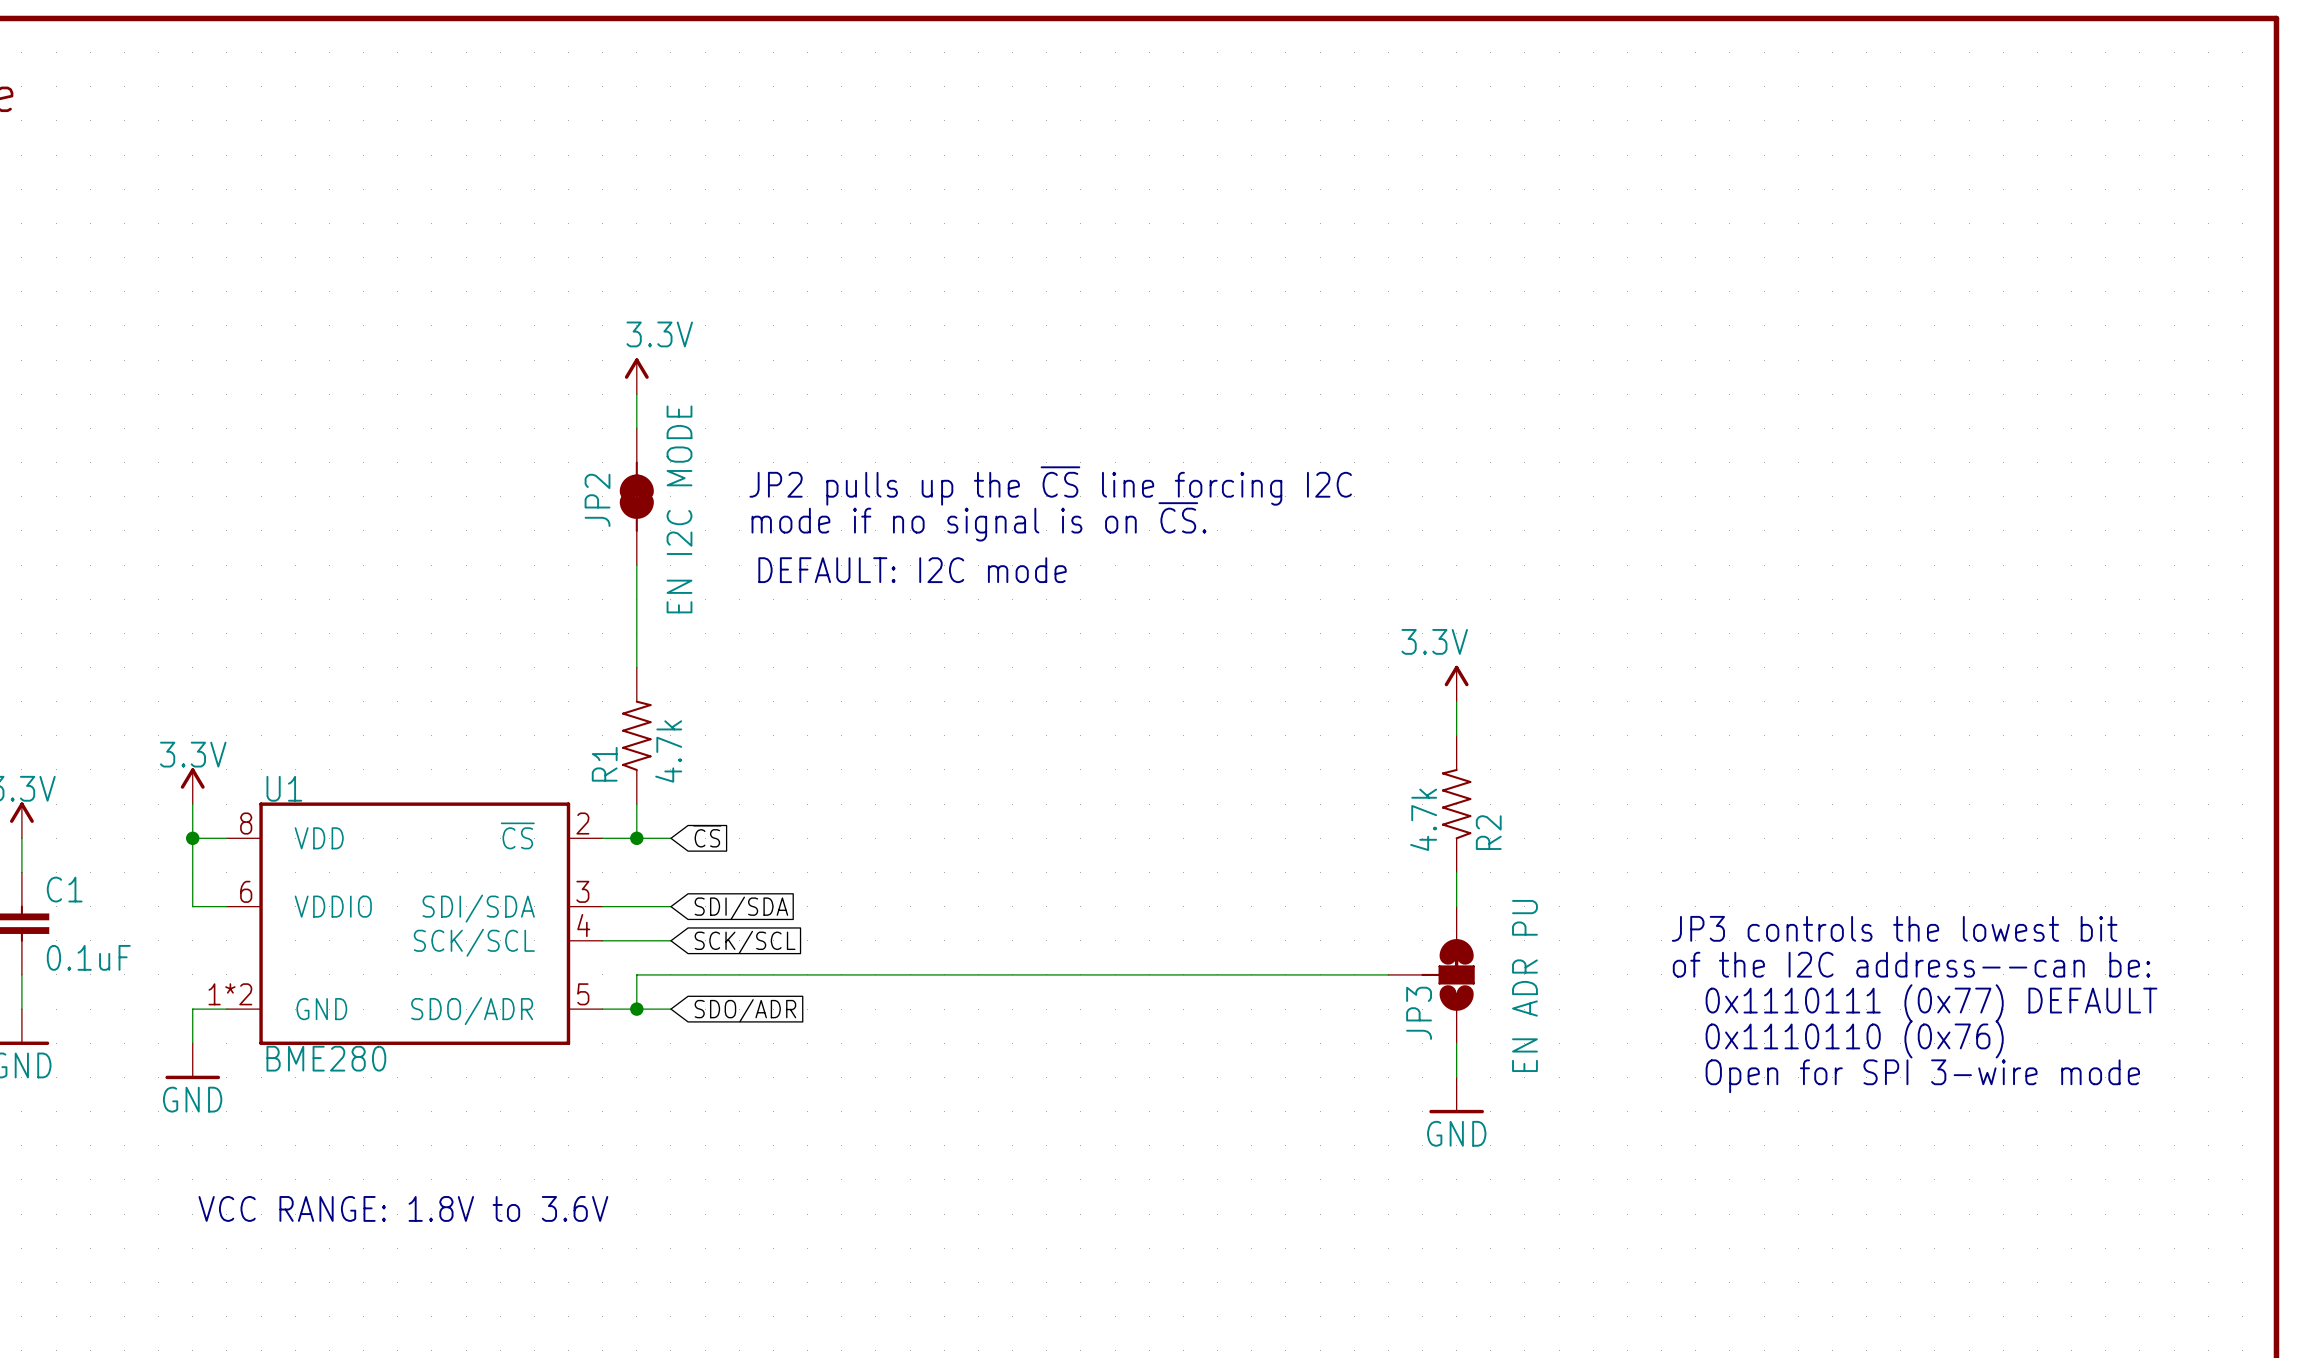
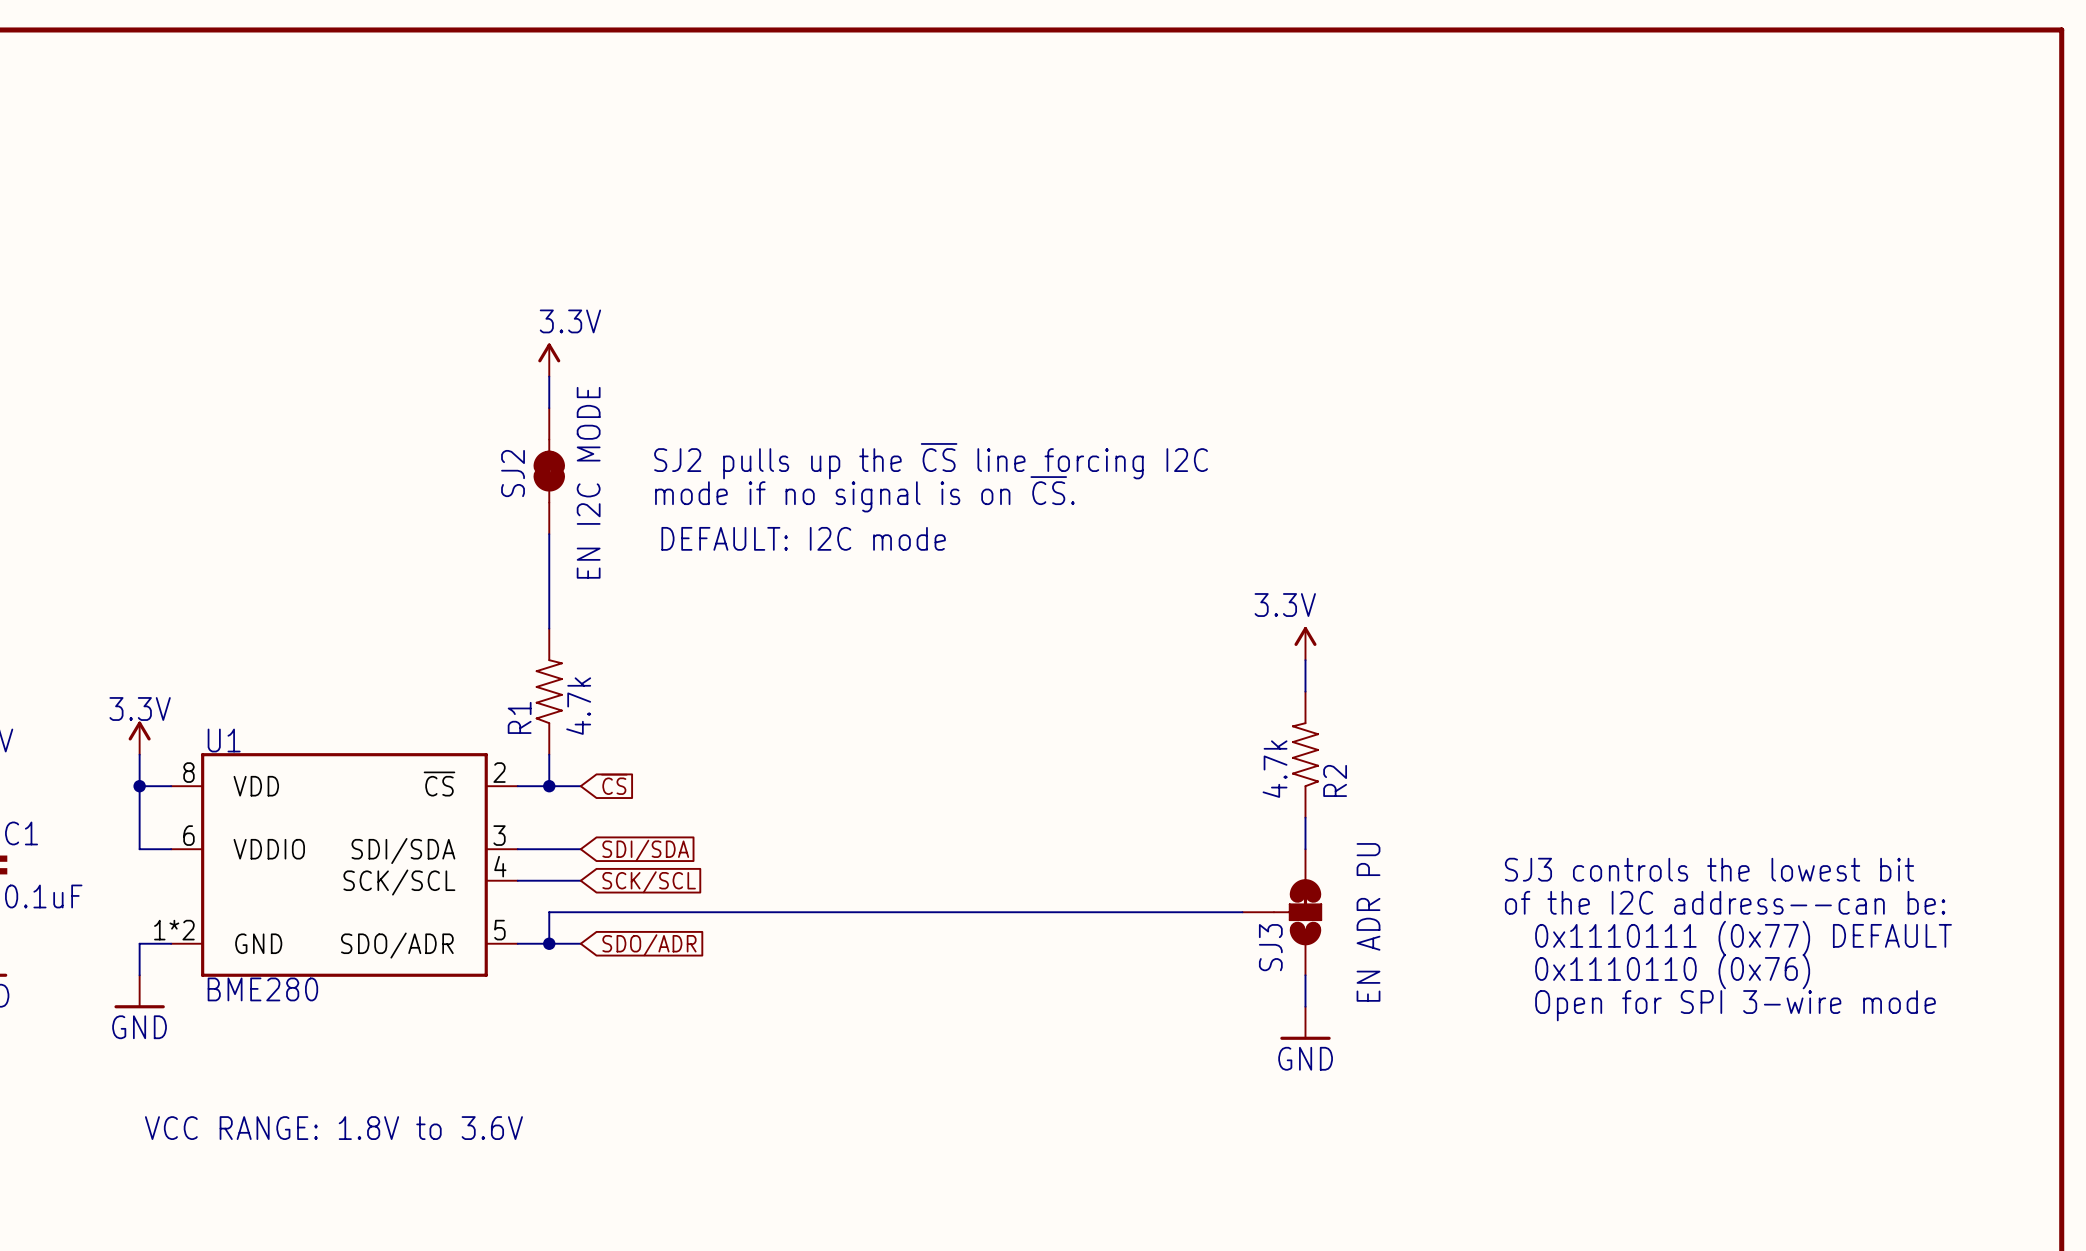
text: JP2 pulls up the ~{CS} line forcing I2C (1050, 485) -> SJ2 pulls up the ~{CS} line forcing I2C (931, 461)
JP2 name: JP2 (597, 500) -> SJ2 (513, 473)
text: JP3 controls the lowest bit (1894, 928) -> SJ3 controls the lowest bit (1709, 869)
JP3 name: JP3 (1419, 1013) -> SJ3 (1270, 947)

